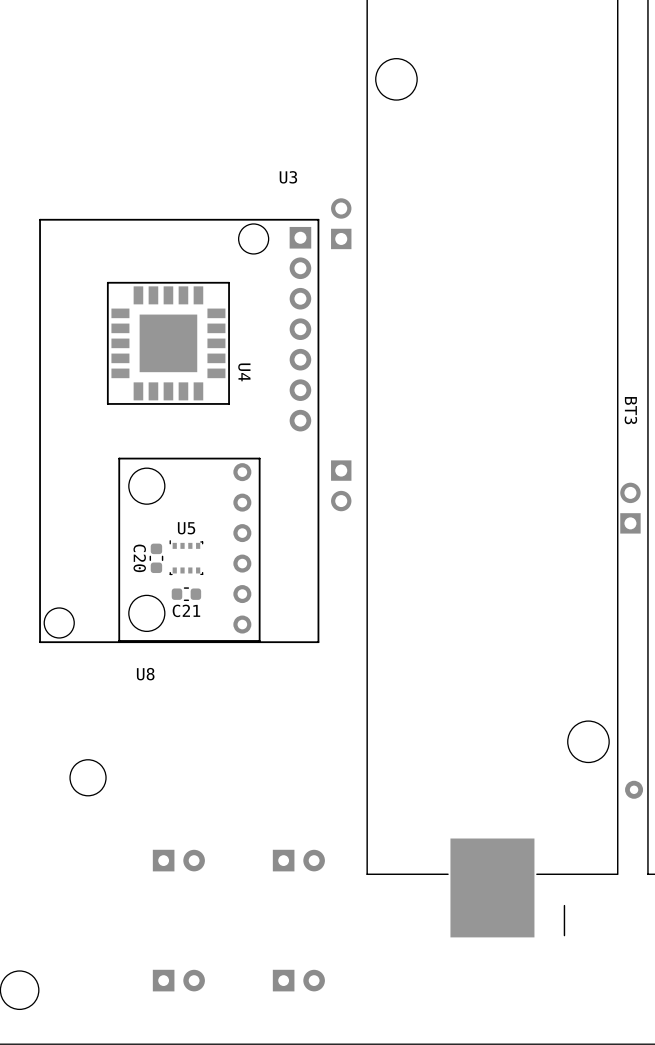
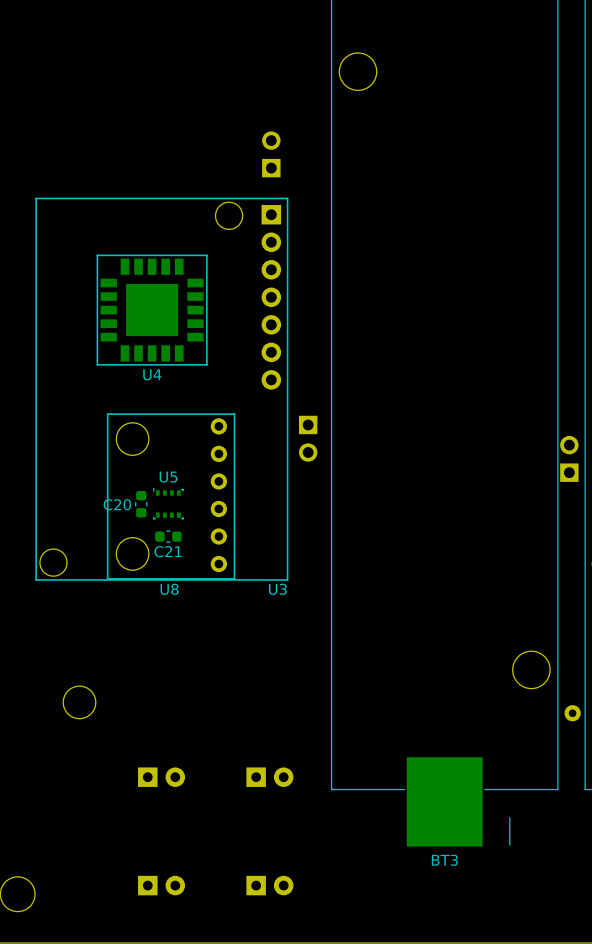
U3 name position: U3 (288, 177) -> U3 (277, 589)
part position: (341, 223) -> (271, 154)
U4 name rotation: 0° (244, 372) -> 90° counterclockwise (152, 374)
U4 name position: U4 (244, 372) -> U4 (152, 374)
BT3 name rotation: 0° (630, 410) -> 90° counterclockwise (444, 860)
BT3 name position: BT3 (630, 410) -> BT3 (444, 860)
C20 name rotation: 0° (139, 558) -> 90° counterclockwise (117, 504)
U8 name position: U8 (145, 674) -> U8 (169, 589)

